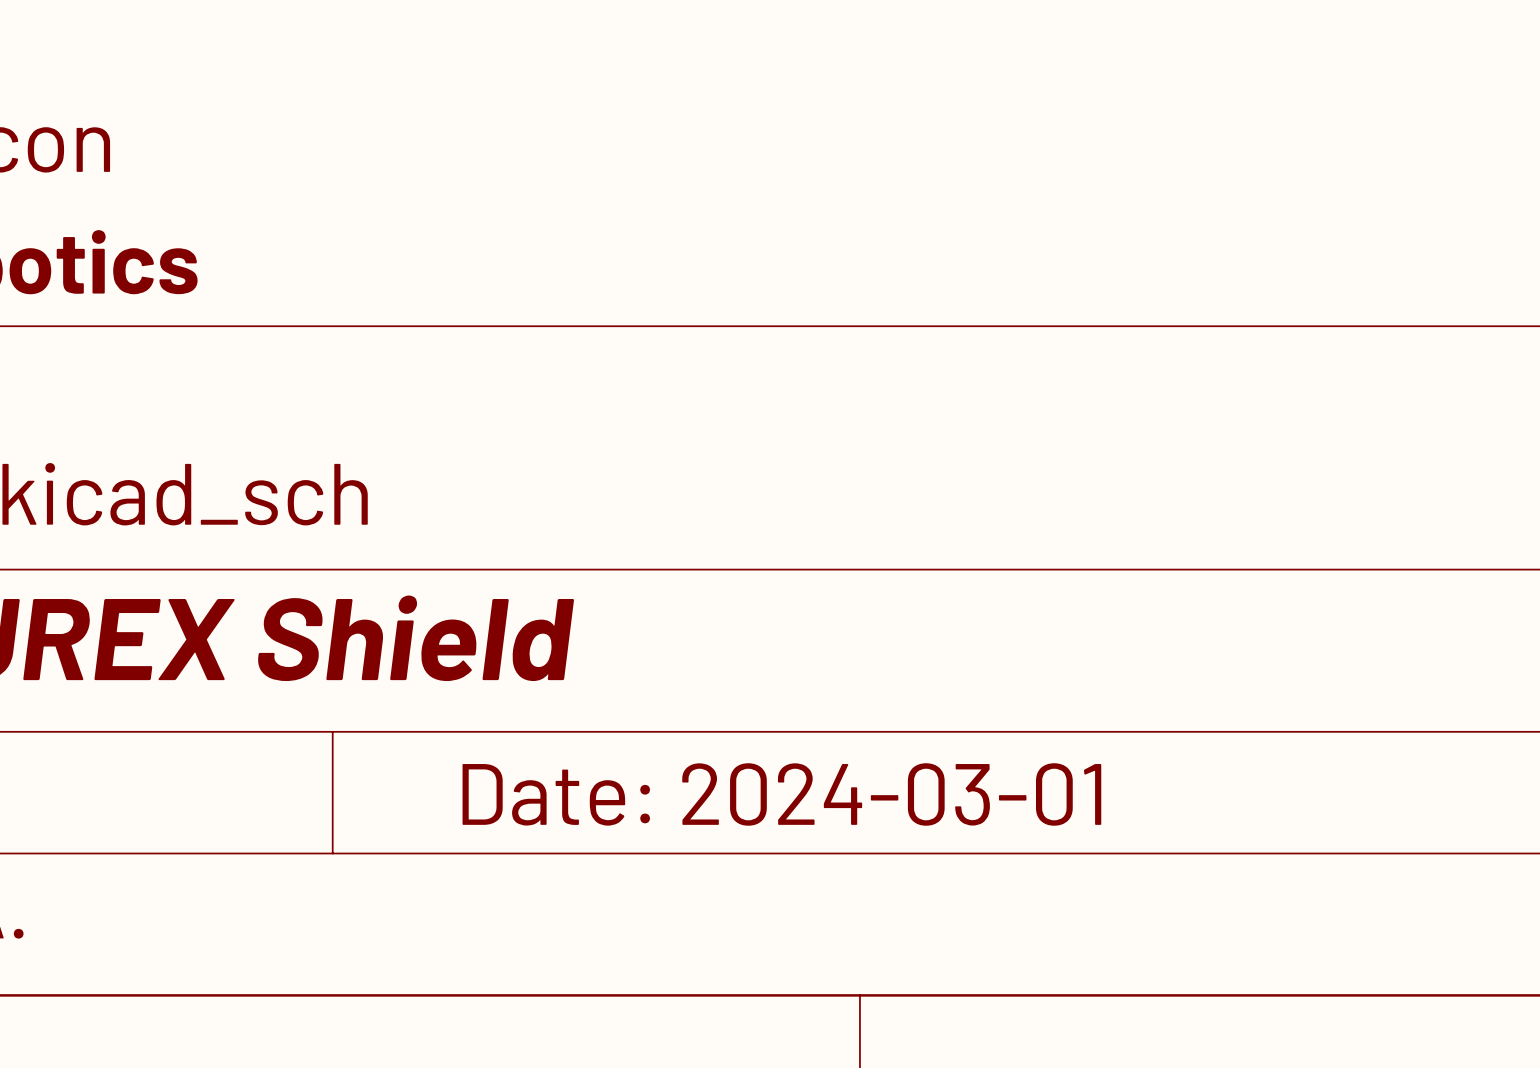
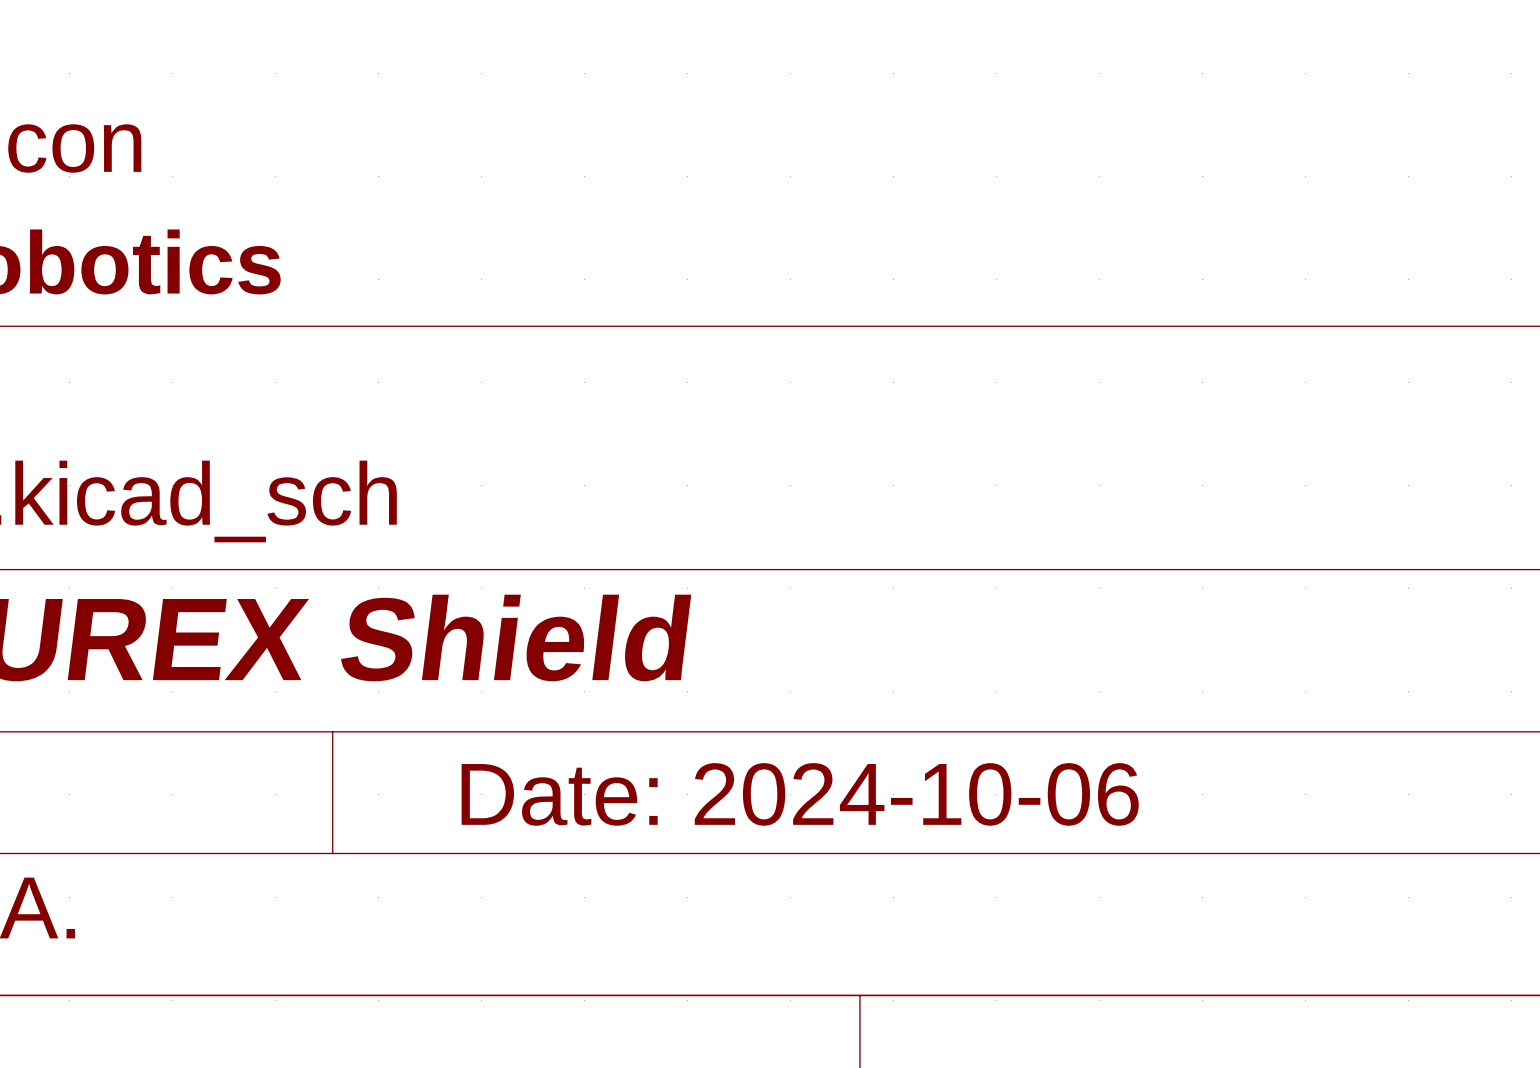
title block: Date: 2024-03-01 (781, 794) -> Date: 2024-10-06 (800, 794)

